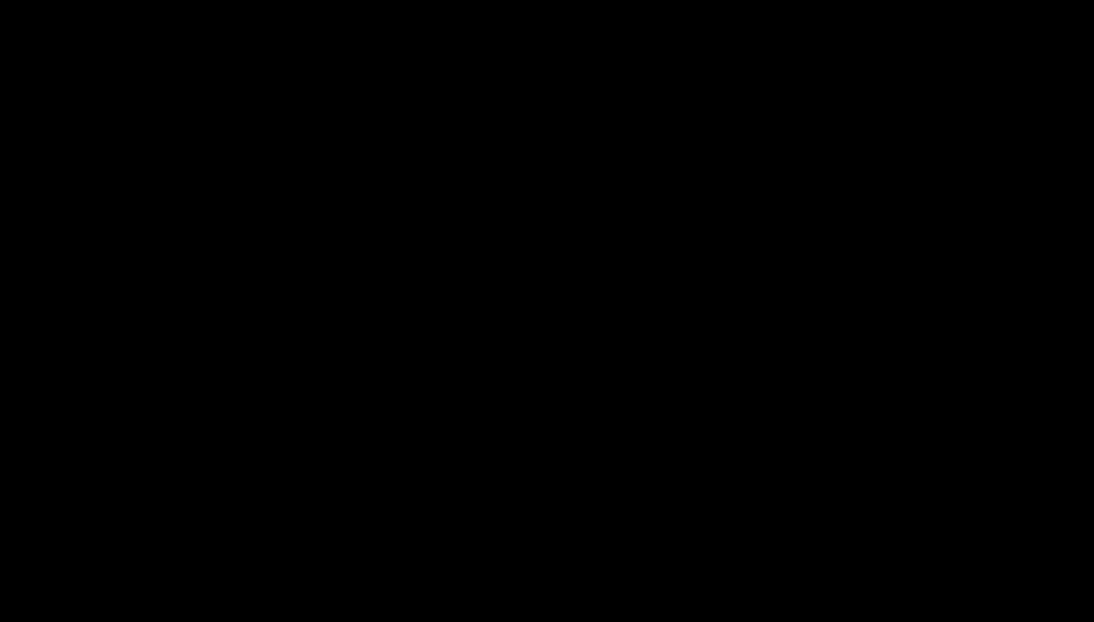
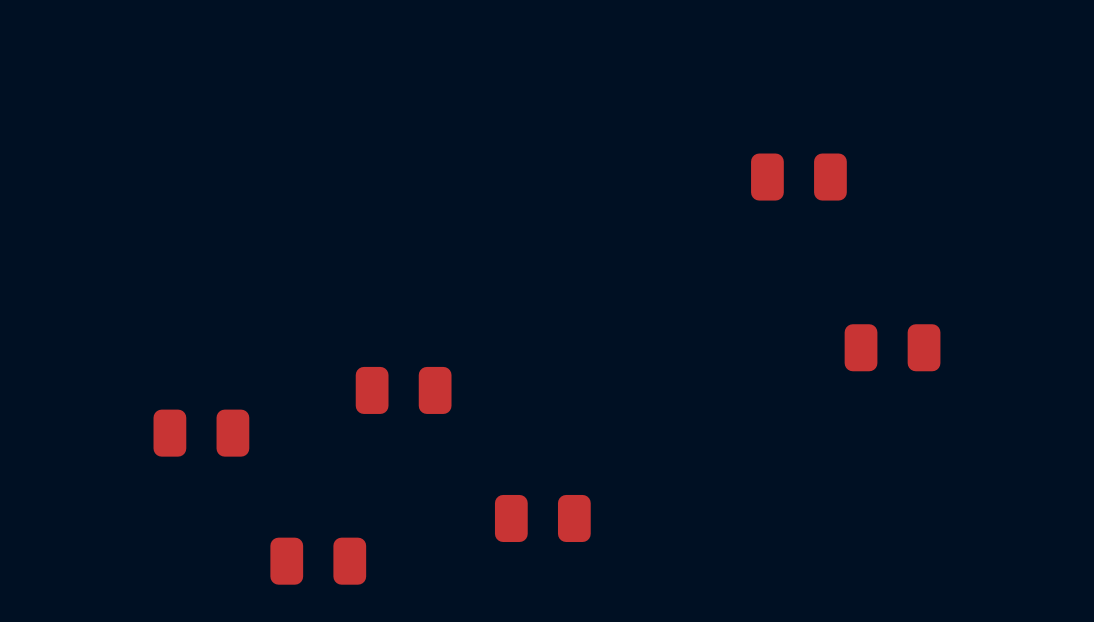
part: none -> (798, 177)
part: none -> (892, 347)
part: none -> (403, 390)
part: none -> (201, 433)
part: none -> (542, 518)
part: none -> (318, 561)

